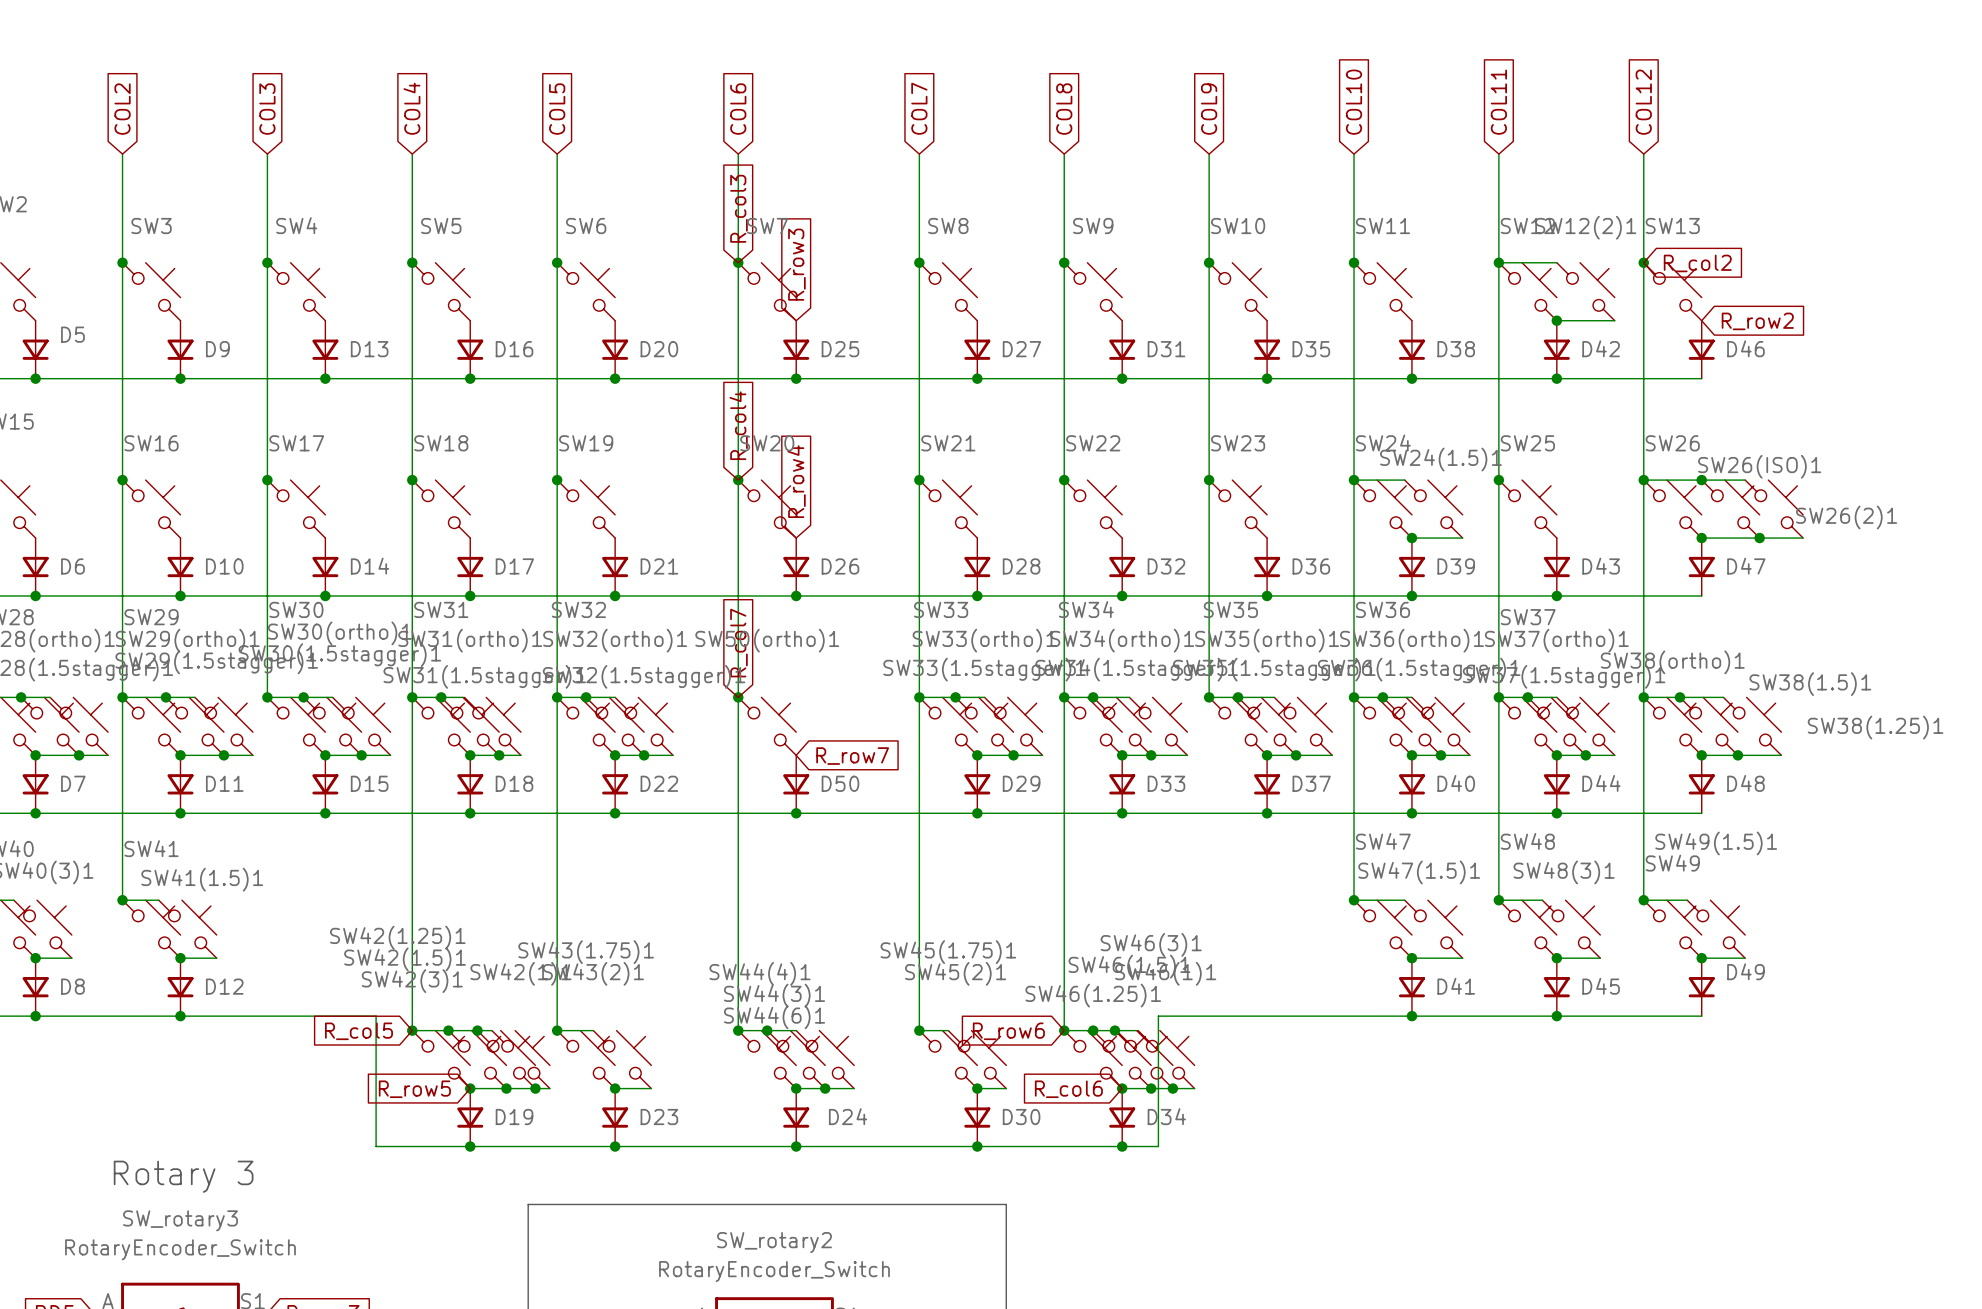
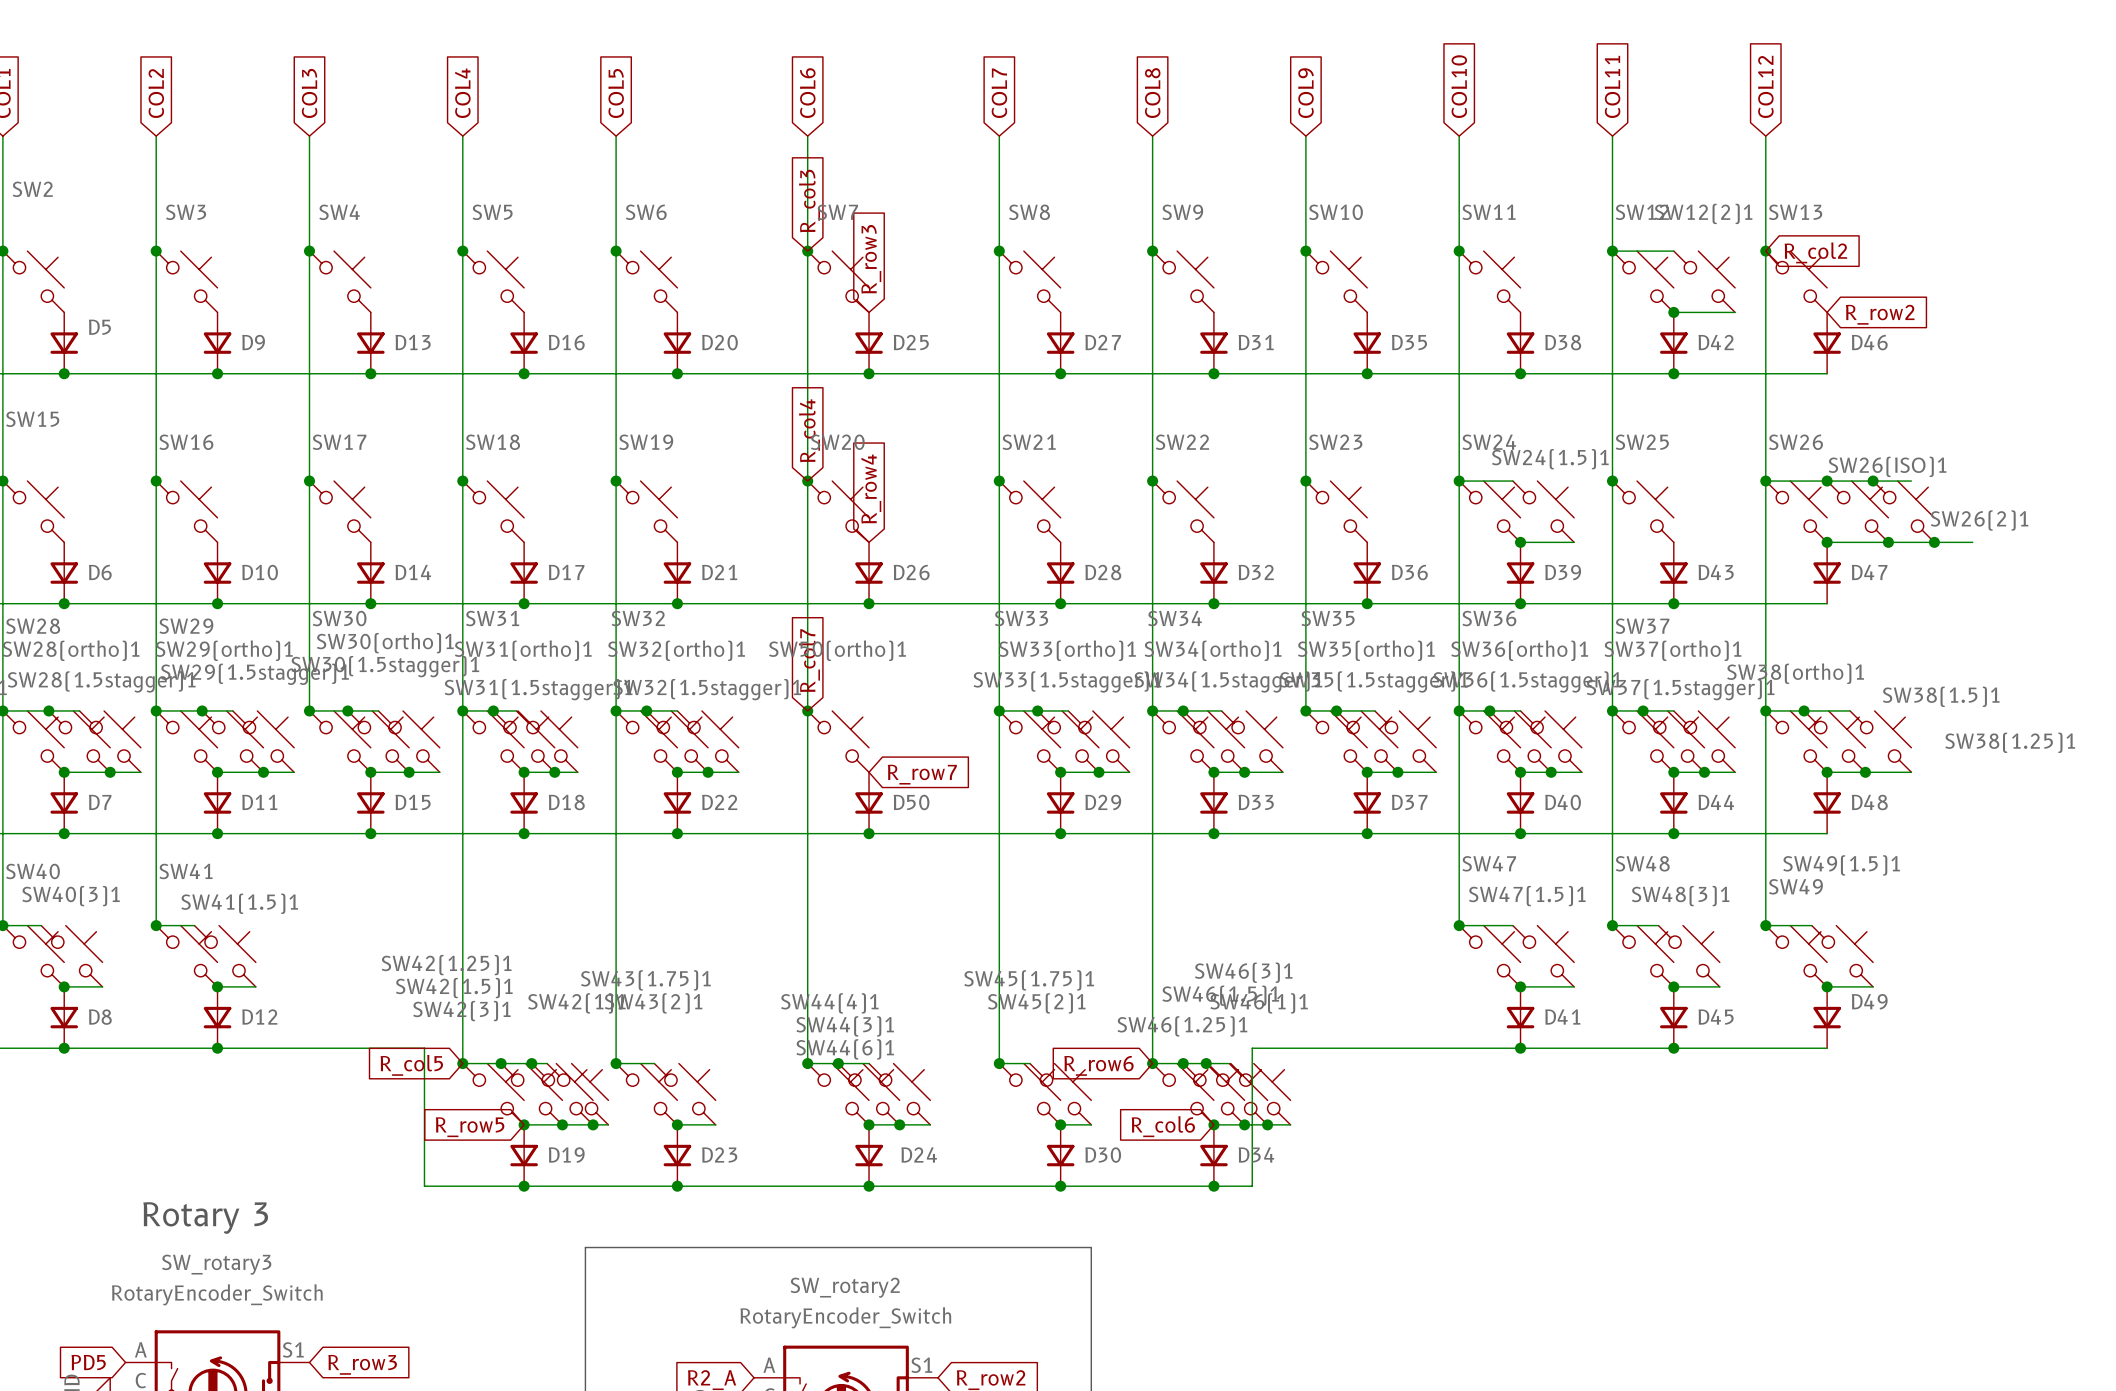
wire: none -> (1873, 481) (1911, 481)
junction: none -> (1873, 481)
wire: none -> (1934, 542) (1972, 542)
junction: none -> (1934, 542)

